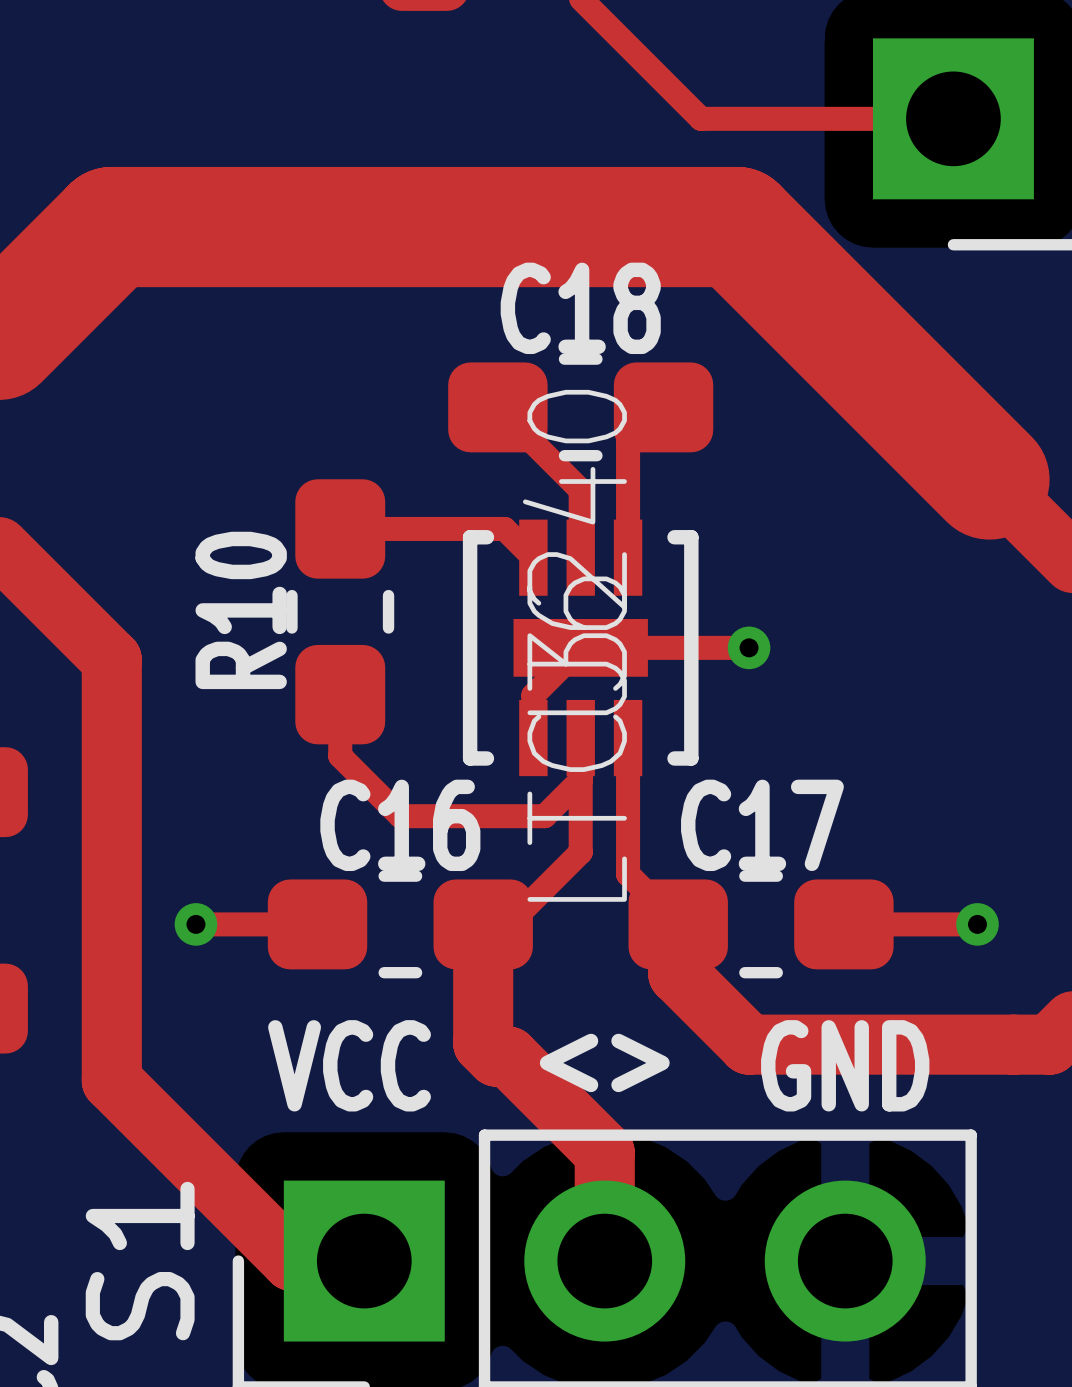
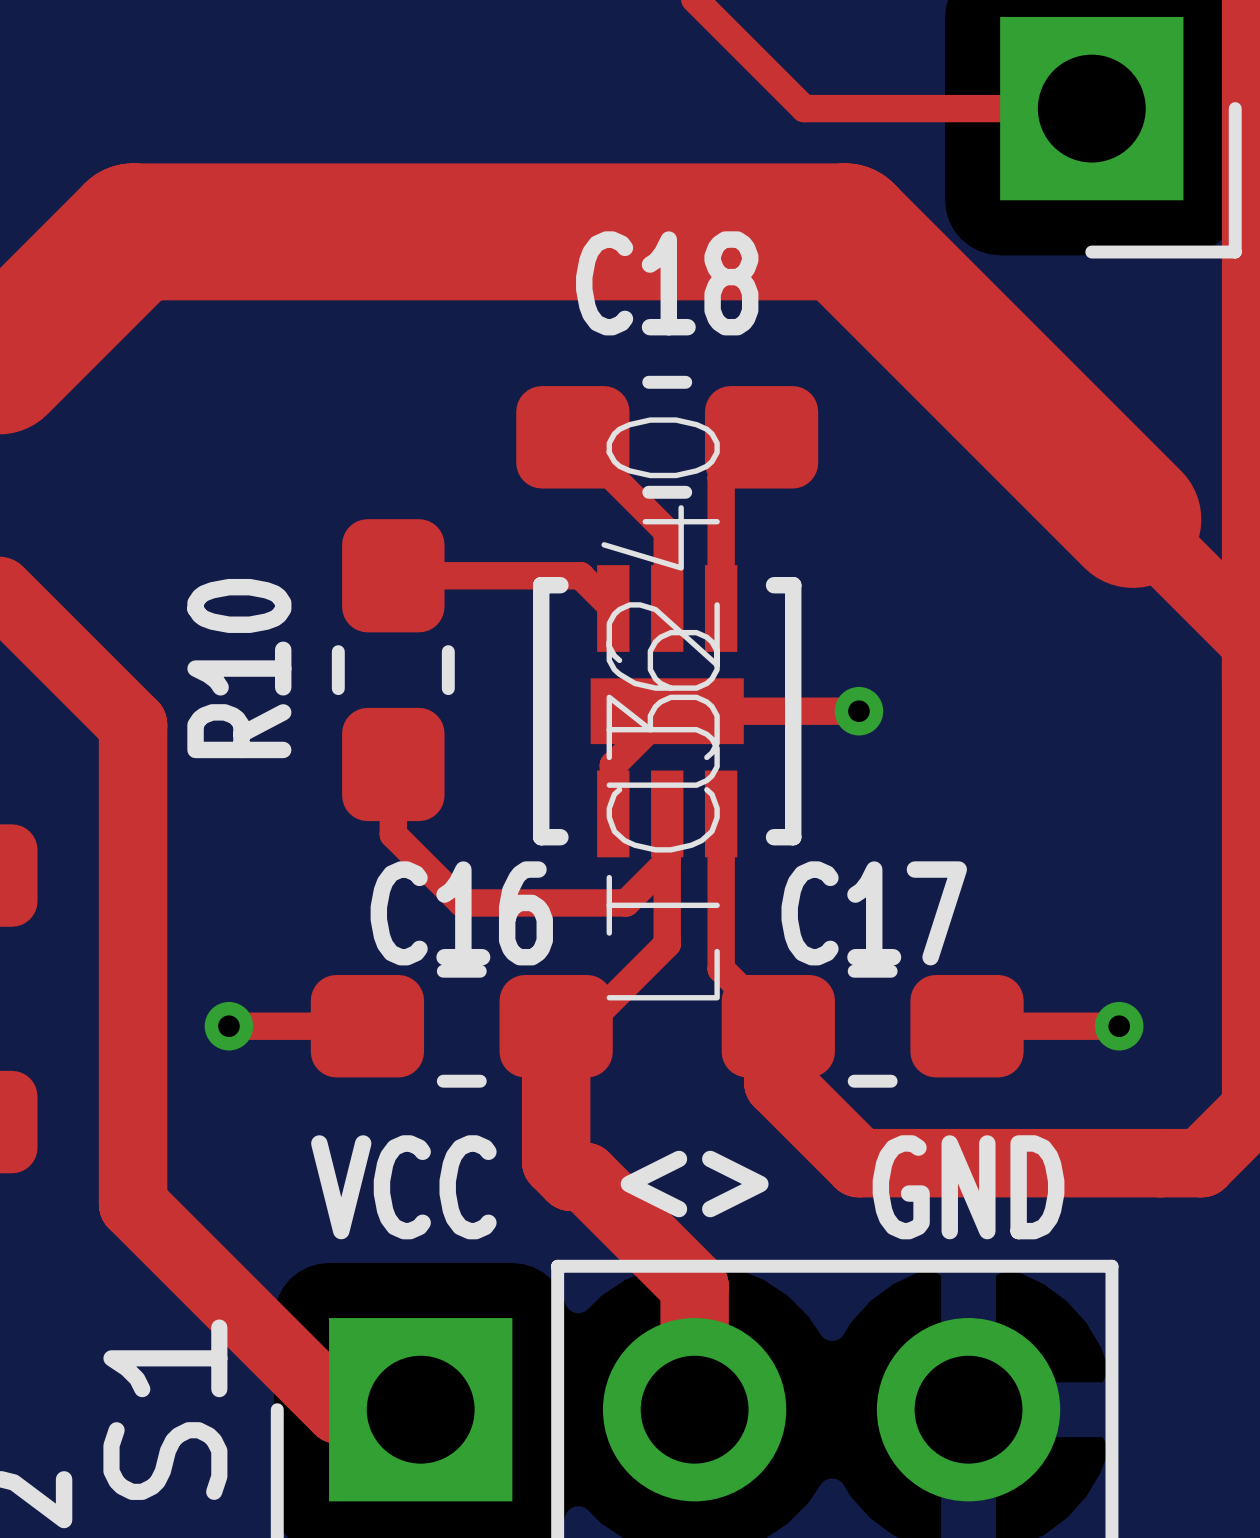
C18 name position: C18 (580, 308) -> C18 (667, 283)
R10 name position: R10 (241, 610) -> R10 (239, 668)

